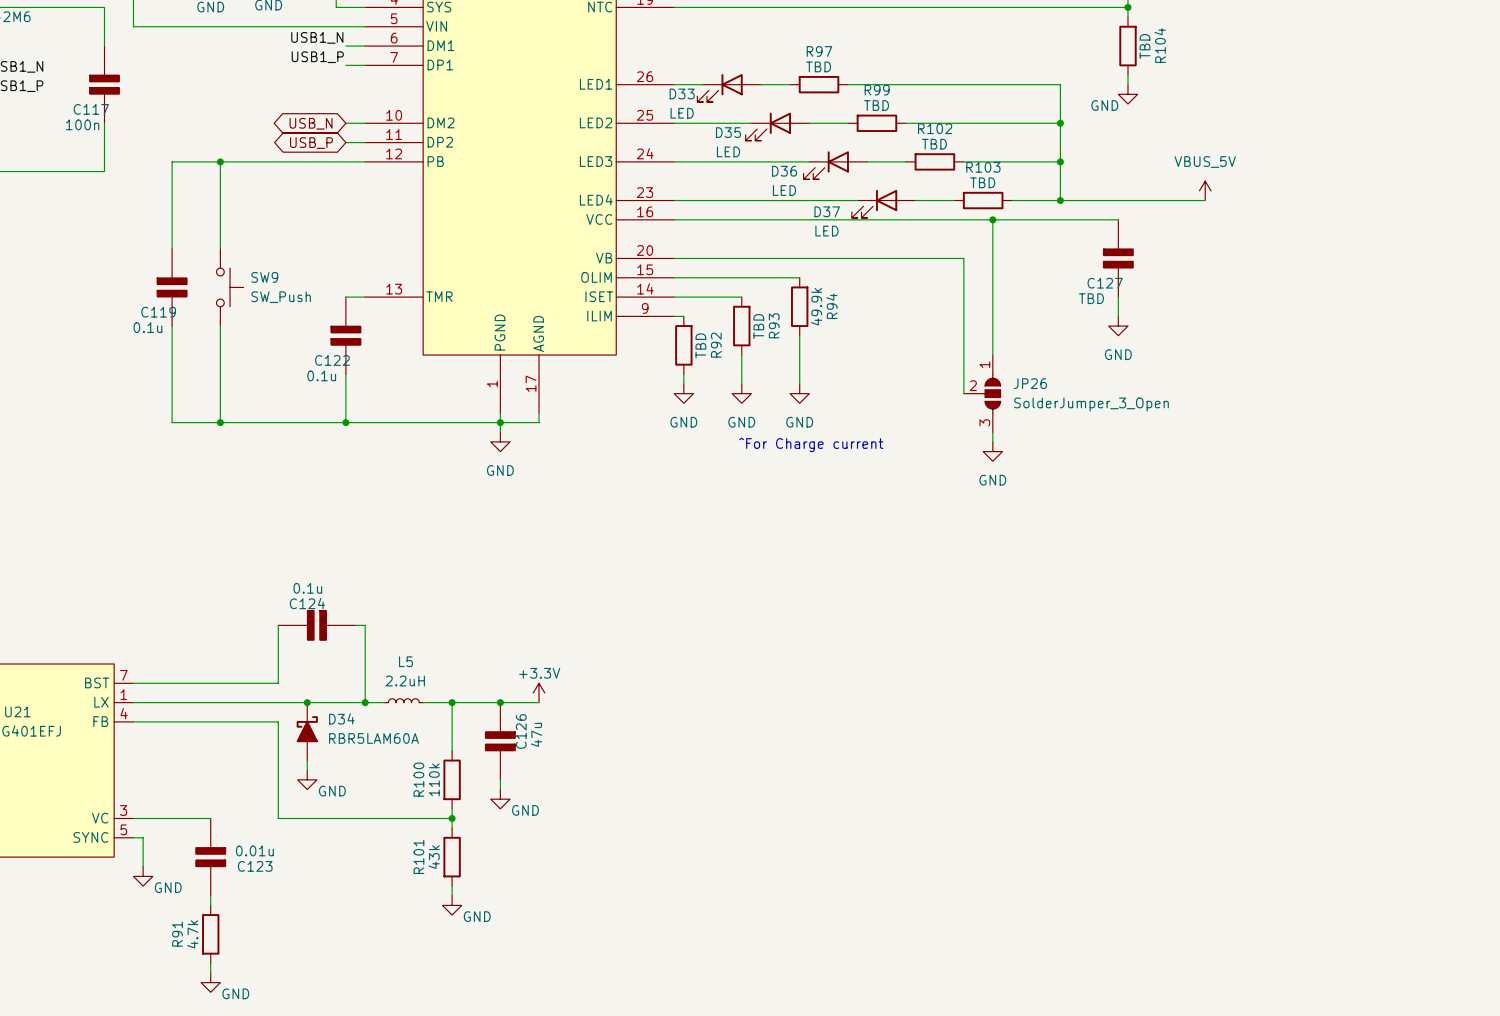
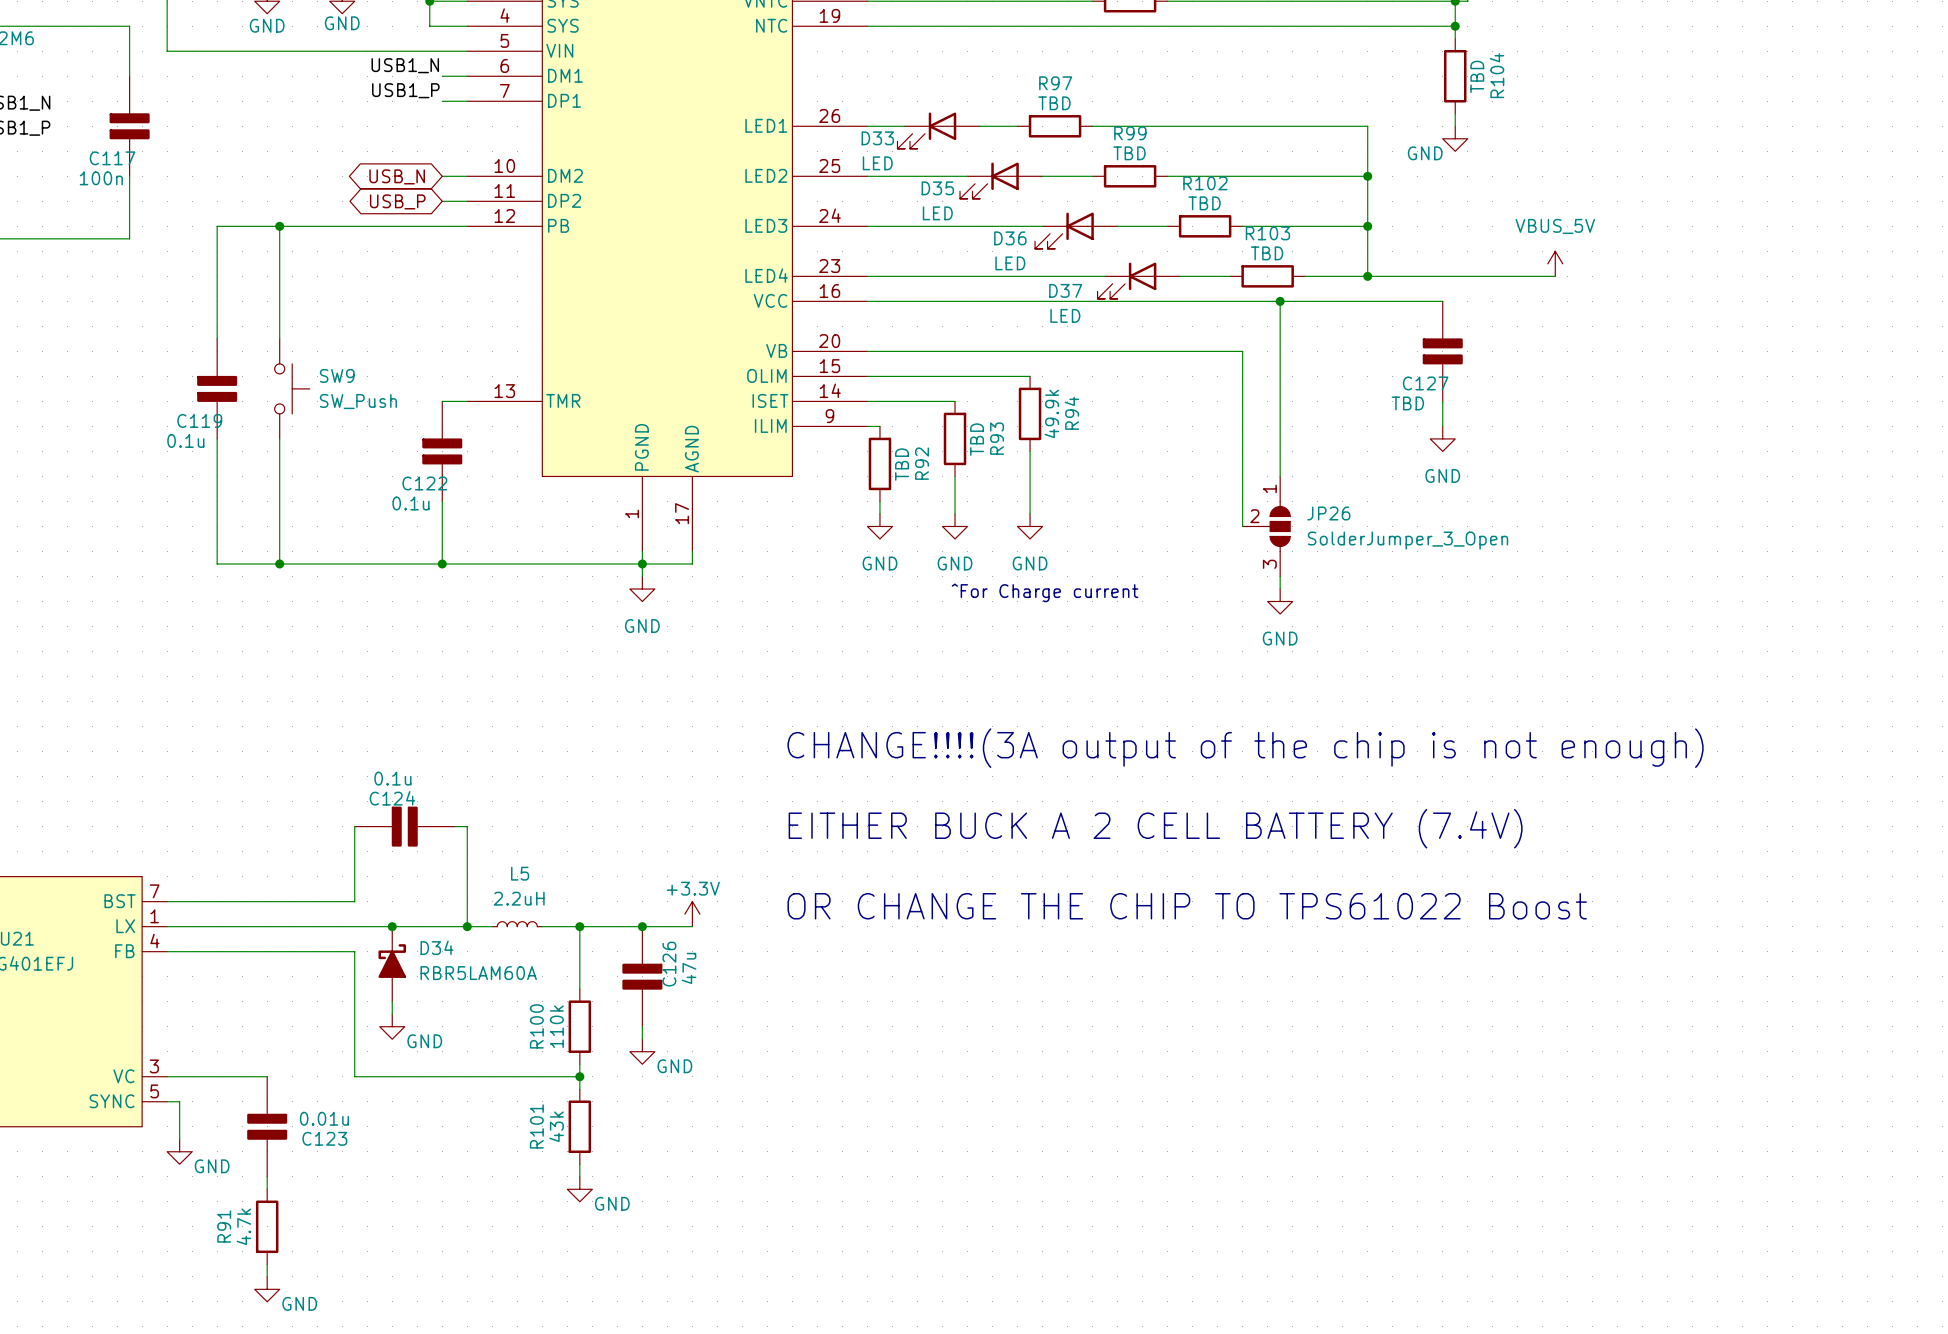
text: none -> CHANGE!!!!(3A output of the chip is not enough) (1245, 748)
text: none -> EITHER BUCK A 2 CELL BATTERY (7.4V) (1155, 828)
text: none -> OR CHANGE THE CHIP TO TPS61022 Boost (1187, 906)

